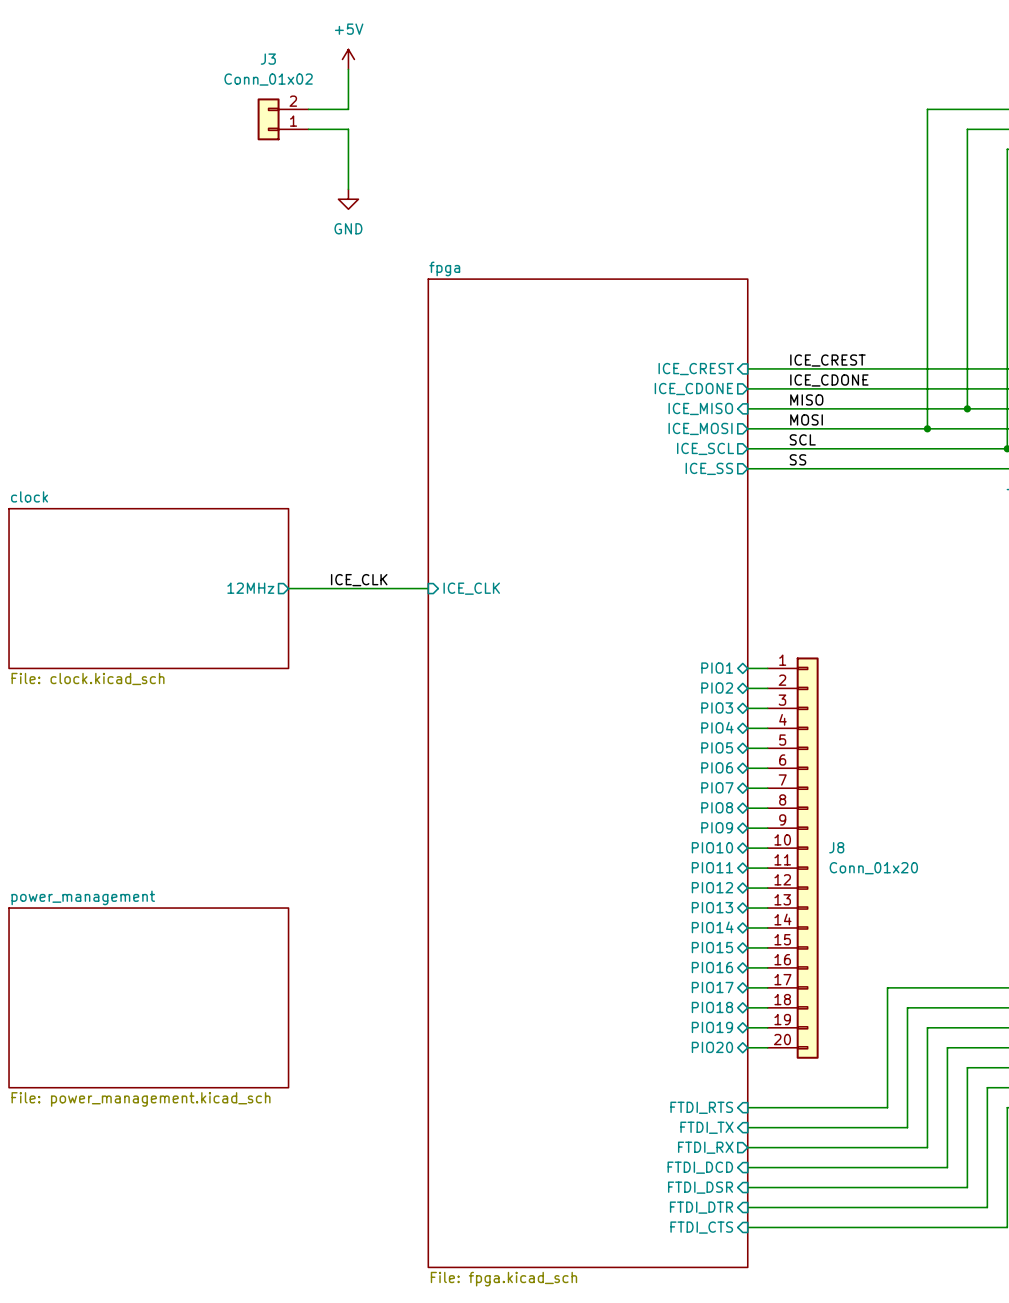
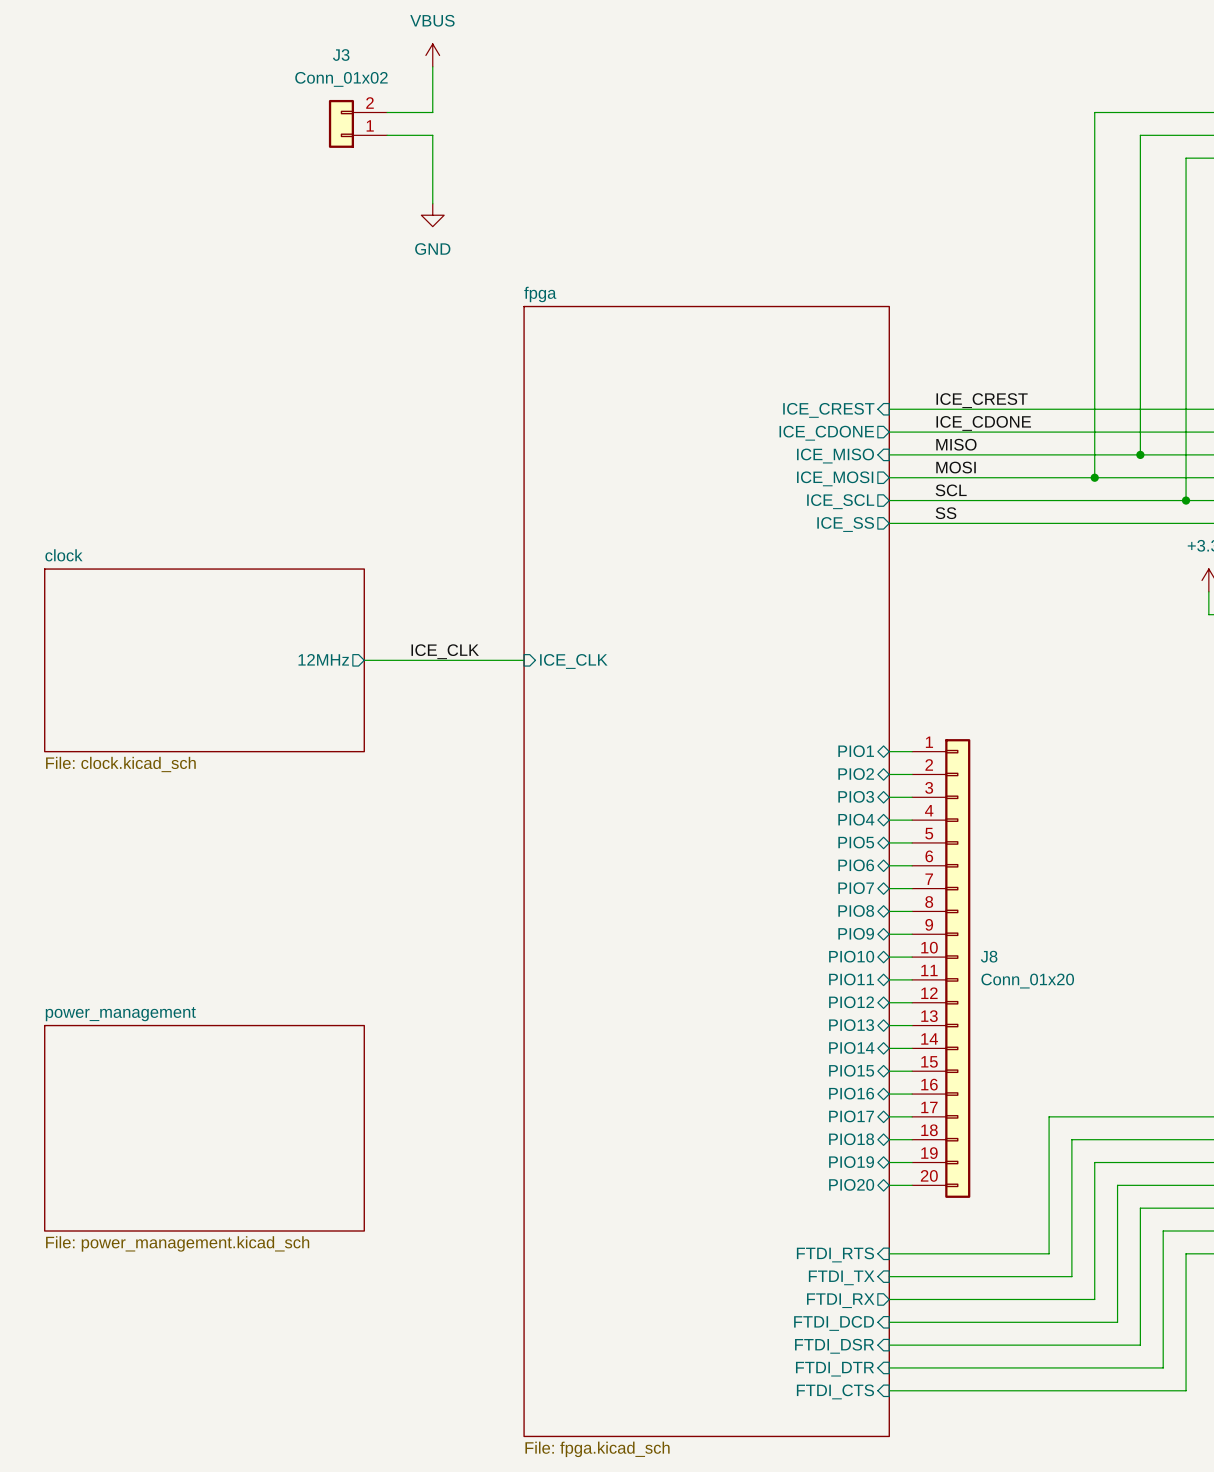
power symbol: +5V (348, 59) -> VBUS (432, 55)

